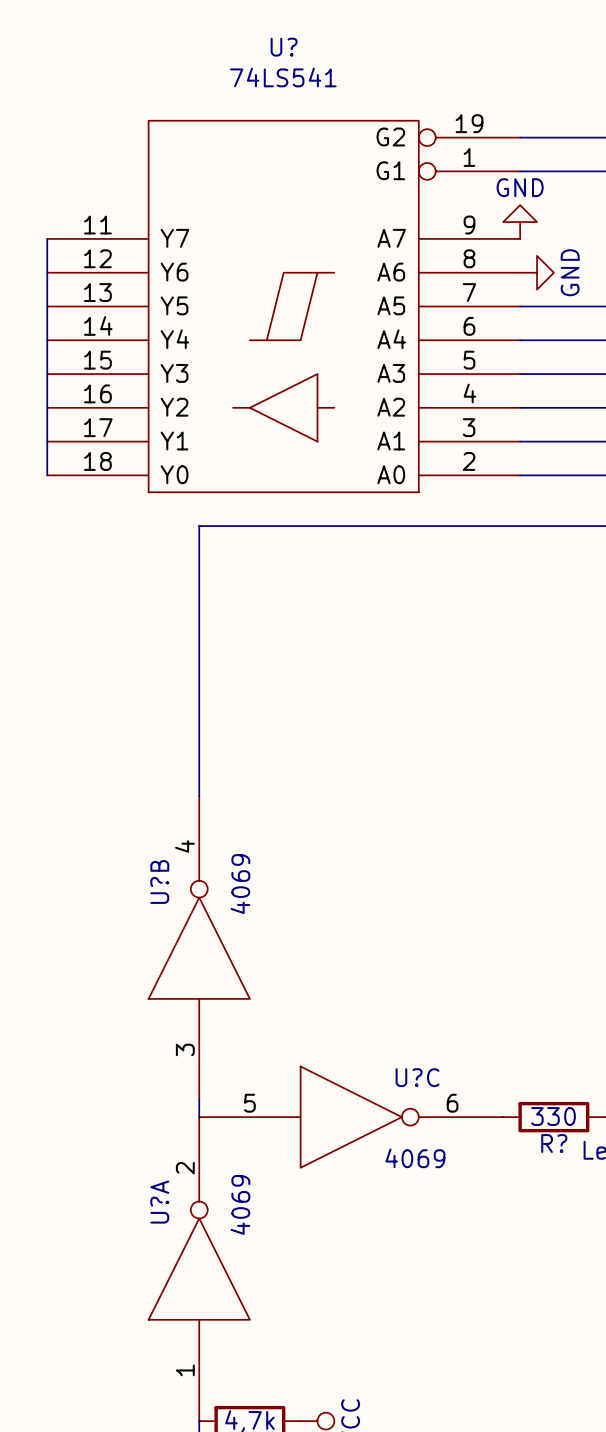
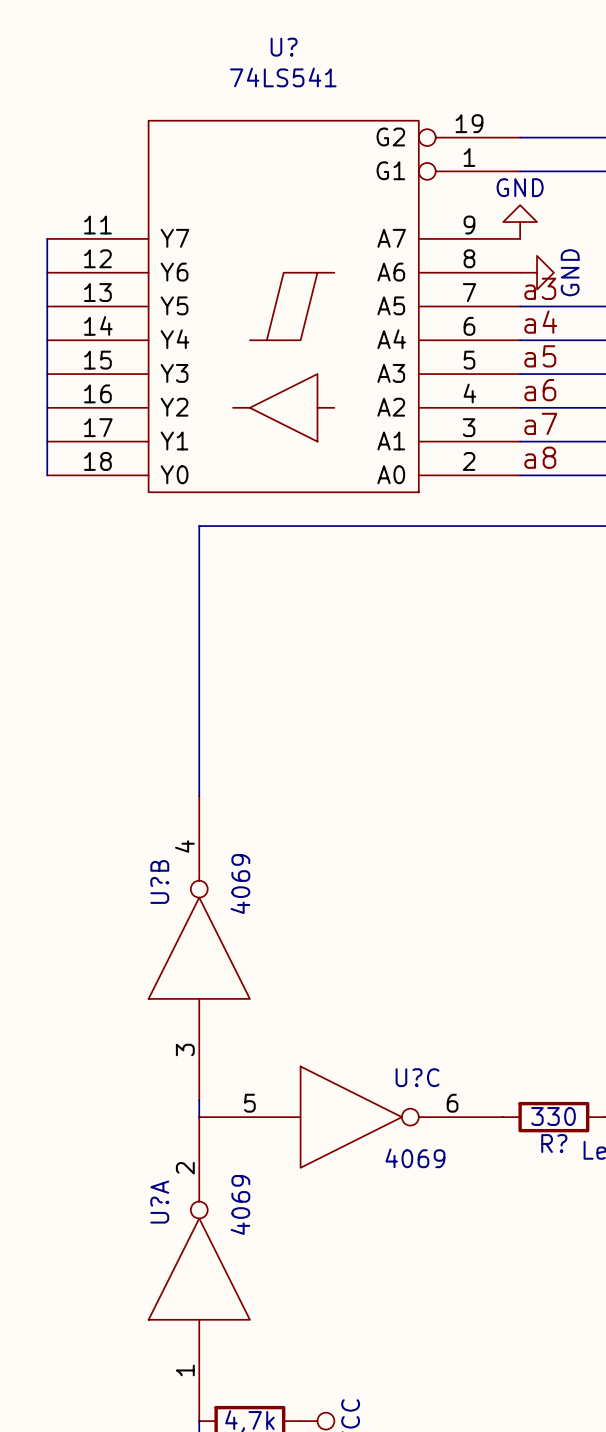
label: none -> a3 (540, 288)
label: none -> a4 (540, 322)
label: none -> a5 (540, 356)
label: none -> a6 (540, 390)
label: none -> a7 (540, 423)
label: none -> a8 (540, 457)

